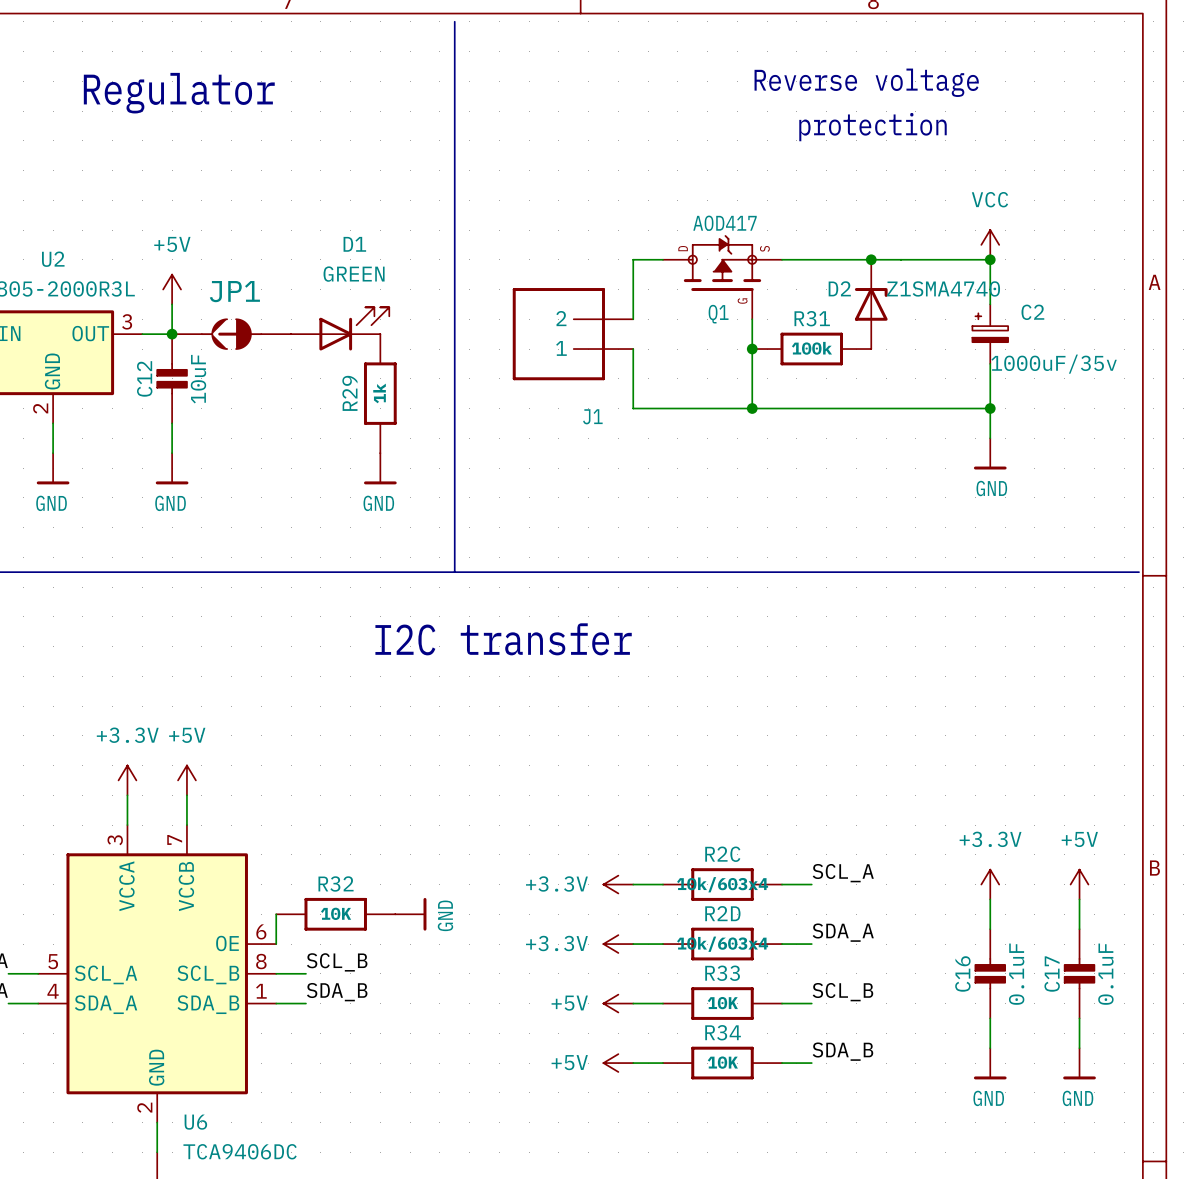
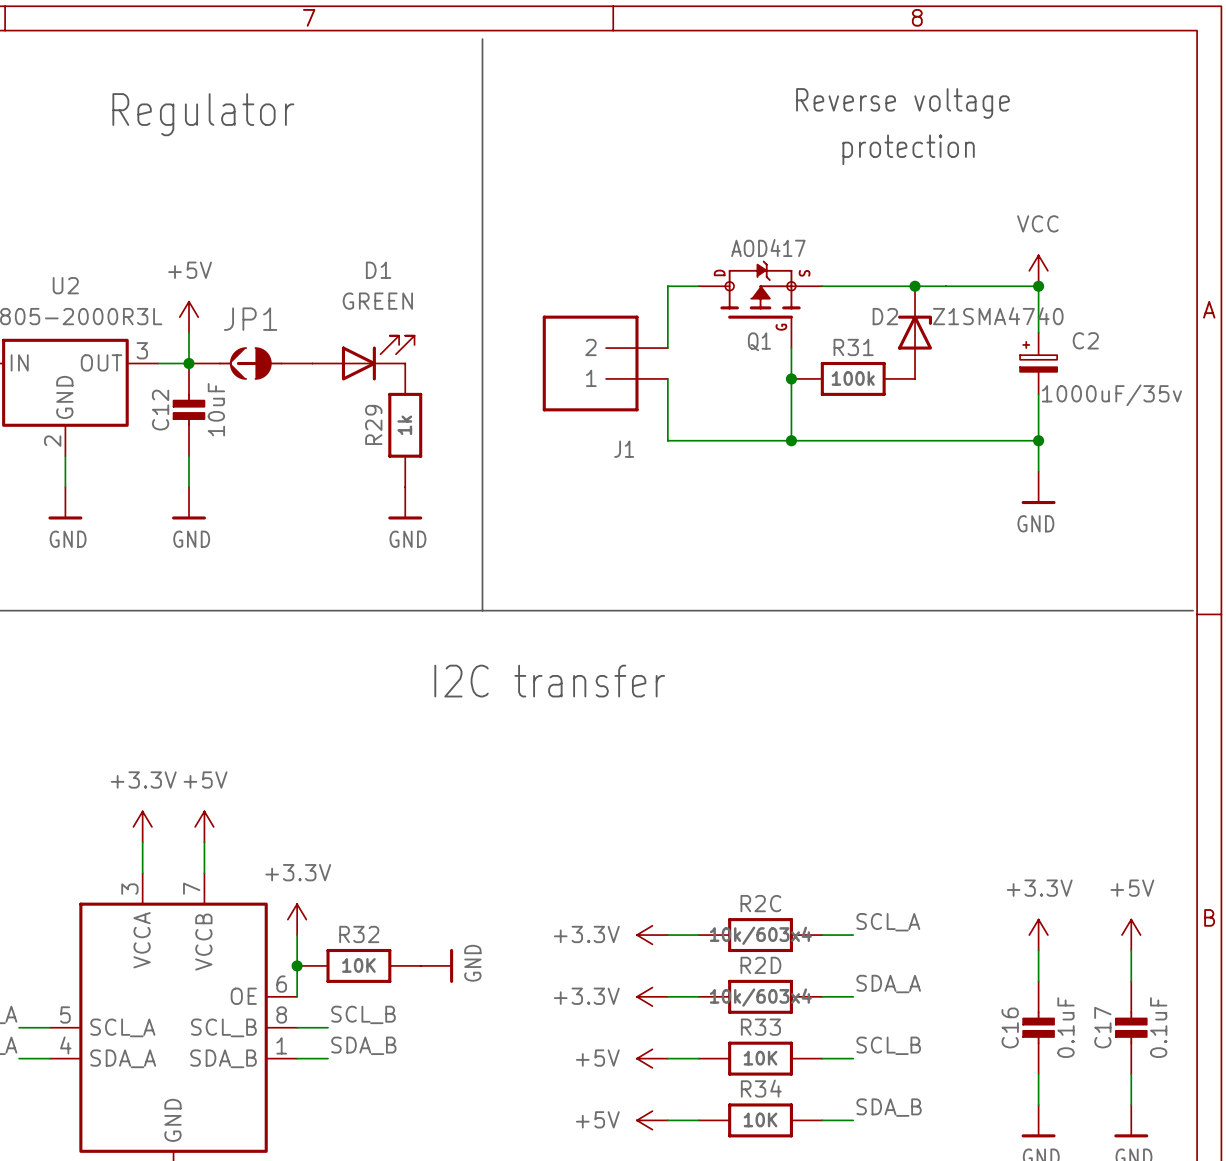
power symbol: none -> +3.3V (297, 919)
wire: none -> (297, 935) (297, 965)
junction: none -> (297, 965)

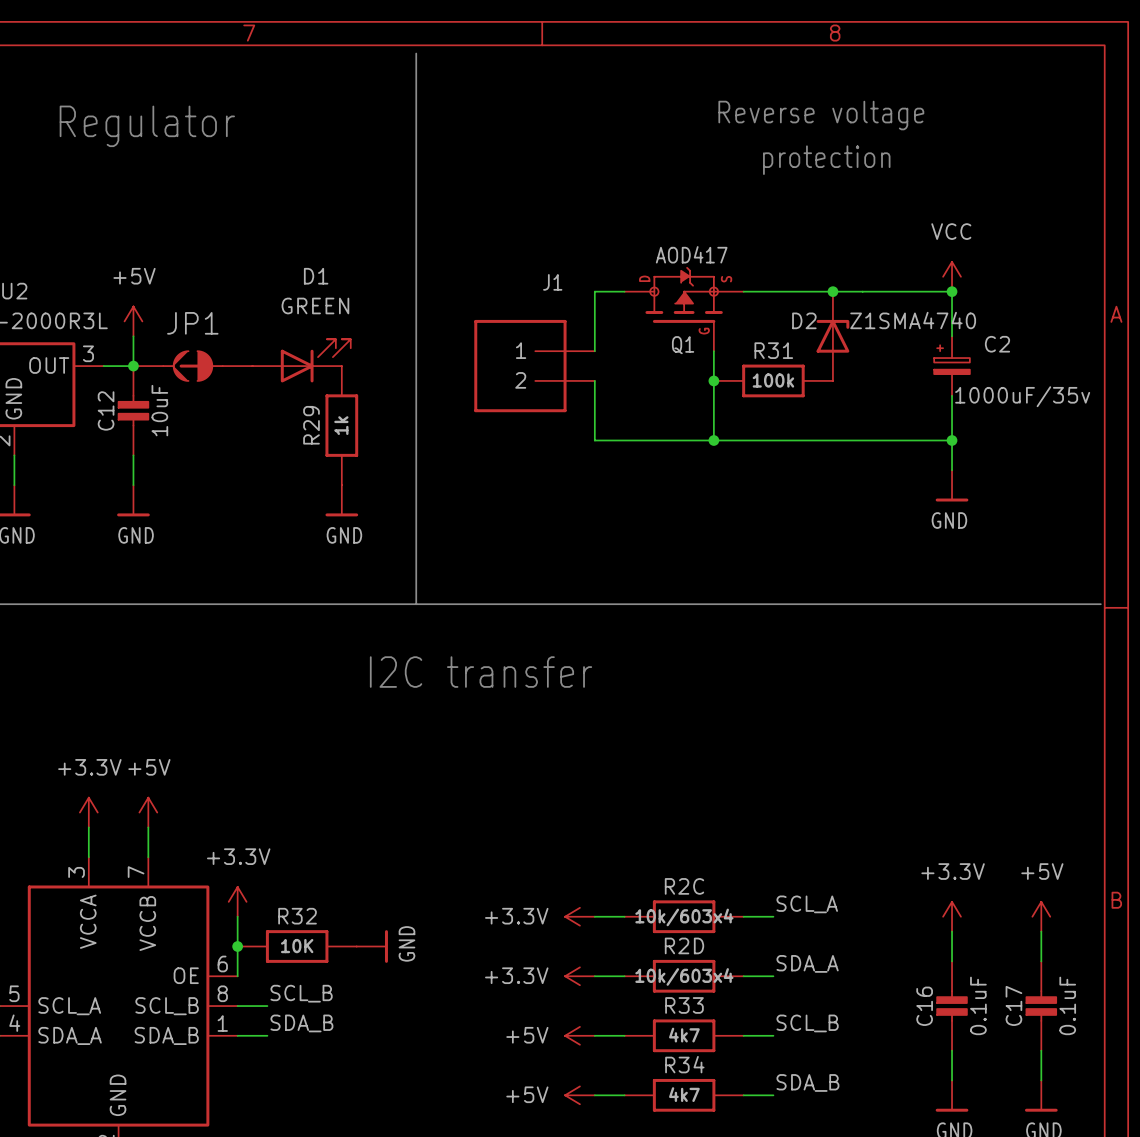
J1 flip: as is (590, 363) -> up-down (520, 366)
R33 value: 10K (760, 1058) -> 4k7 (684, 1035)
R34 value: 10K (760, 1119) -> 4k7 (684, 1094)

